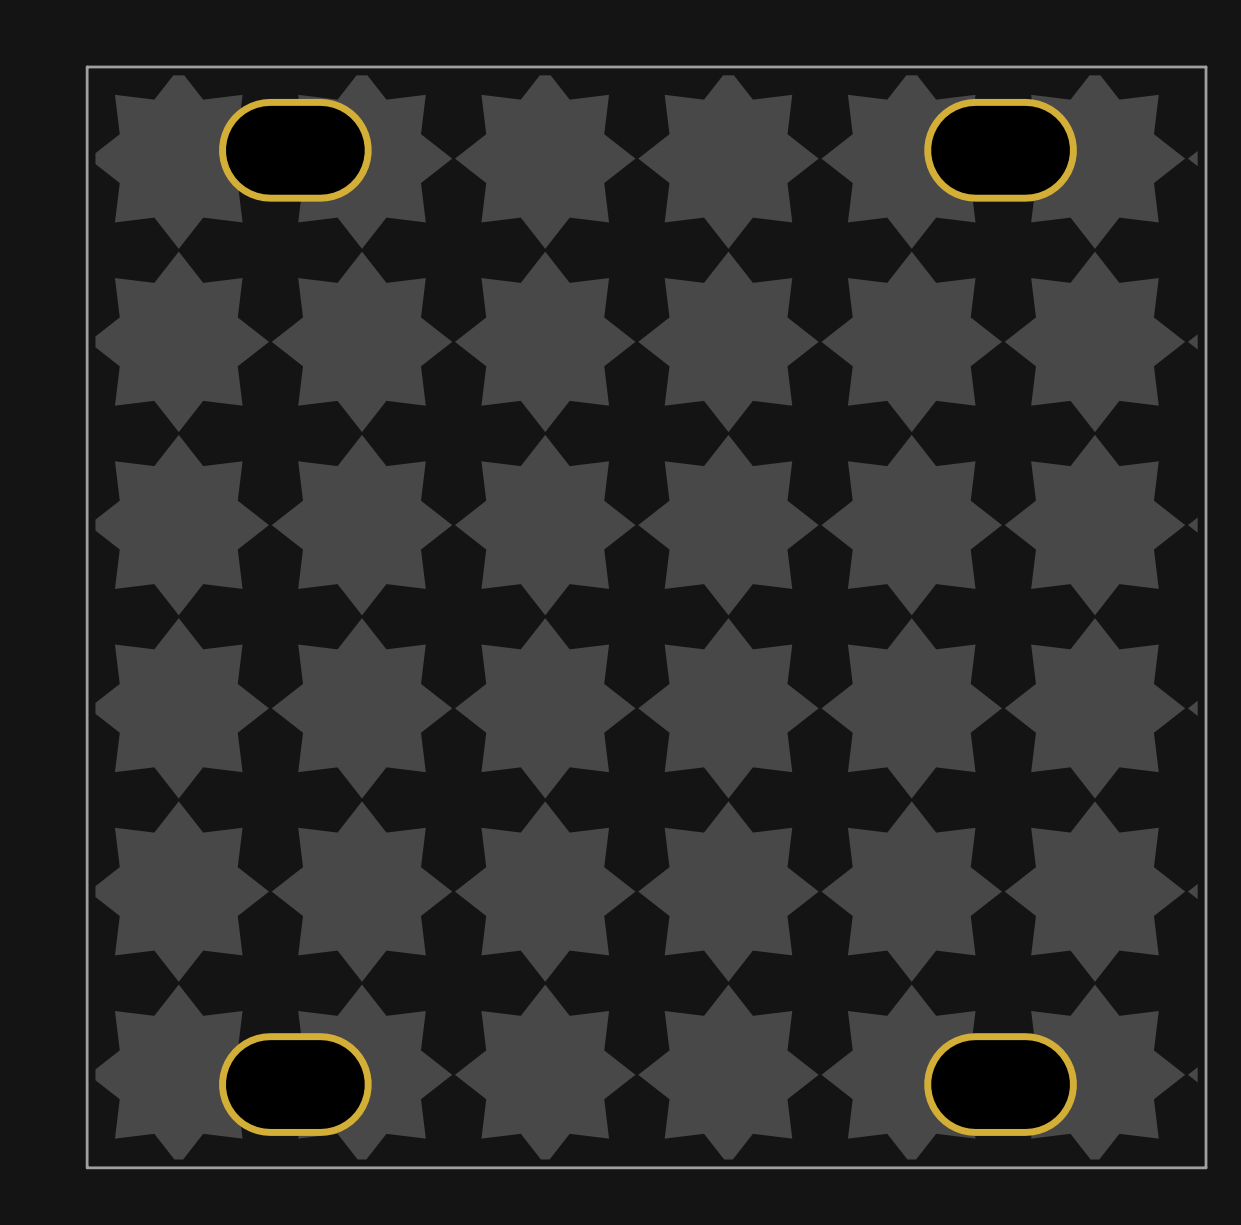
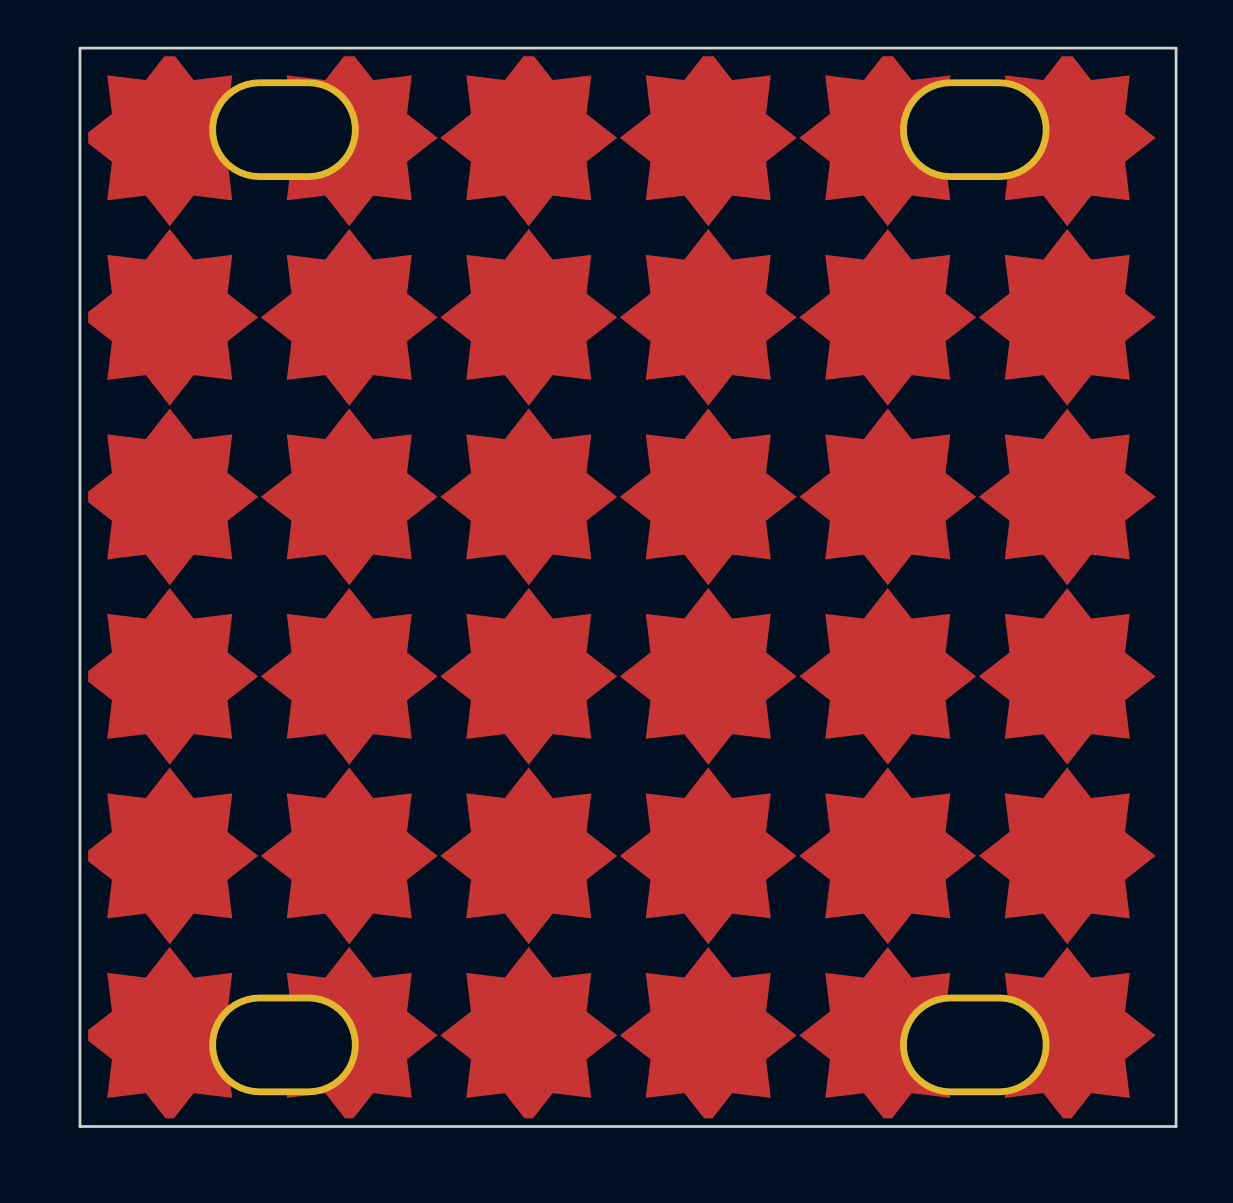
drawing: [1187, 151, 1198, 167] -> none
drawing: [1187, 334, 1198, 350] -> none
drawing: [1187, 517, 1198, 533] -> none
drawing: [1187, 700, 1198, 716] -> none
drawing: [1187, 883, 1198, 900] -> none
drawing: [1187, 1067, 1198, 1083] -> none

